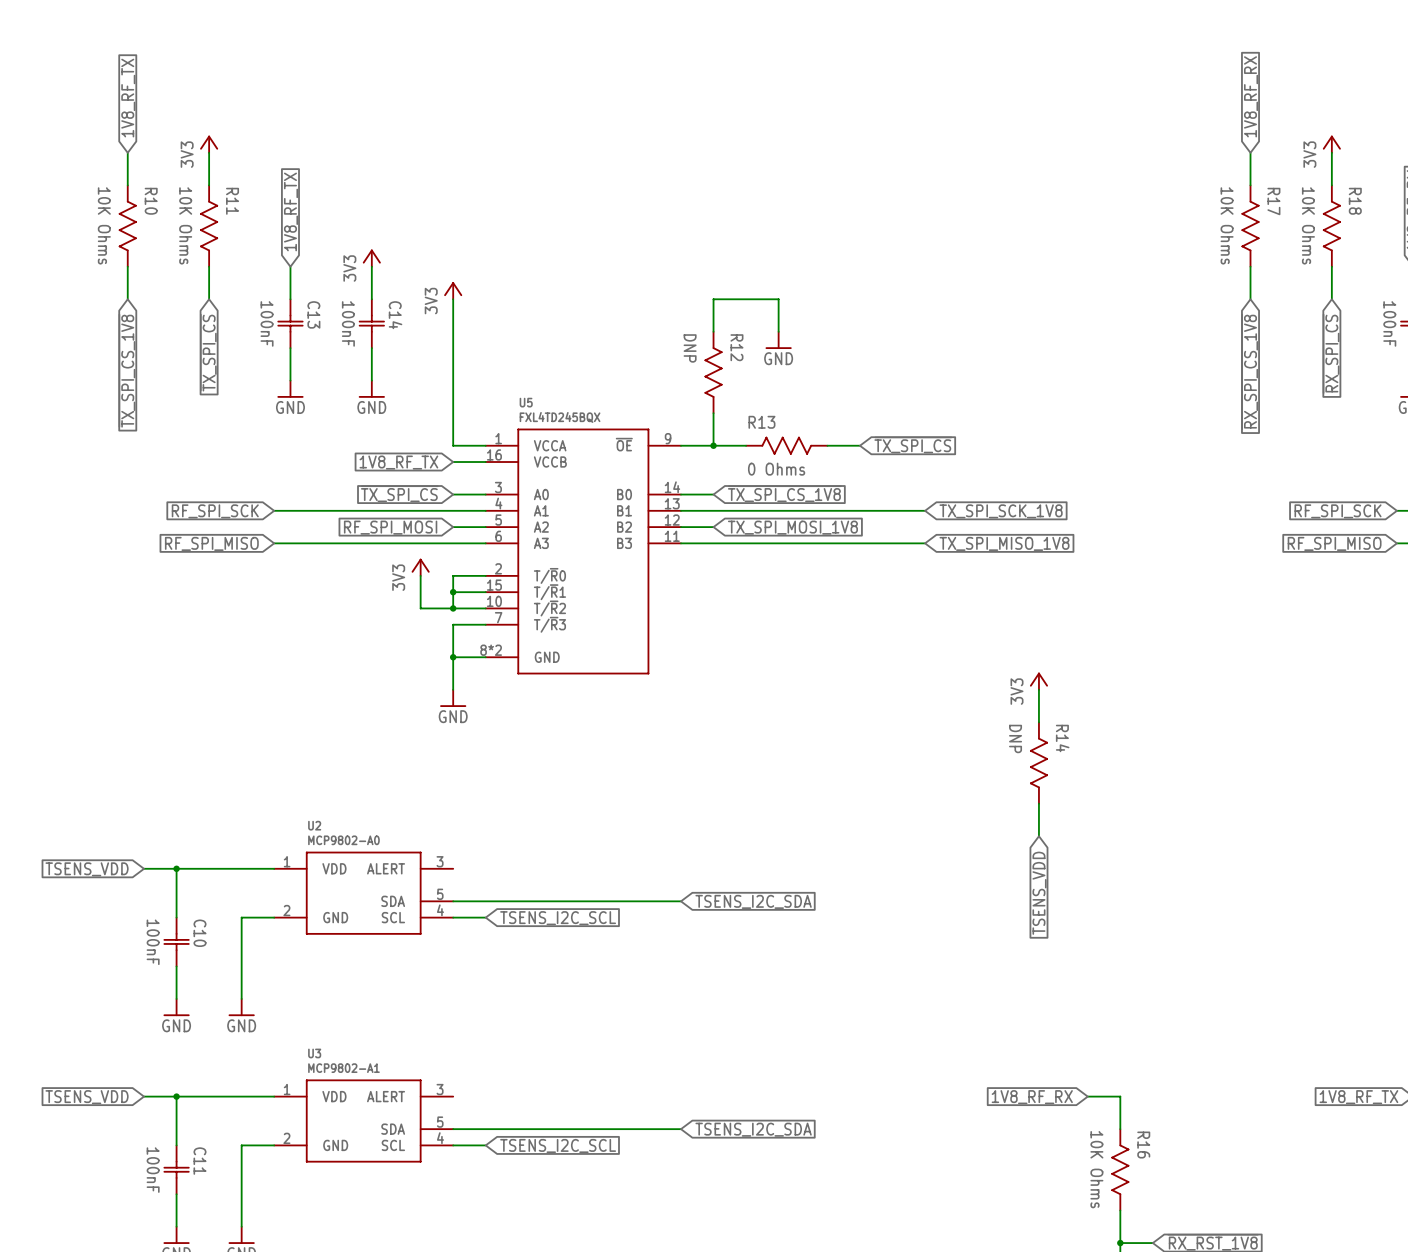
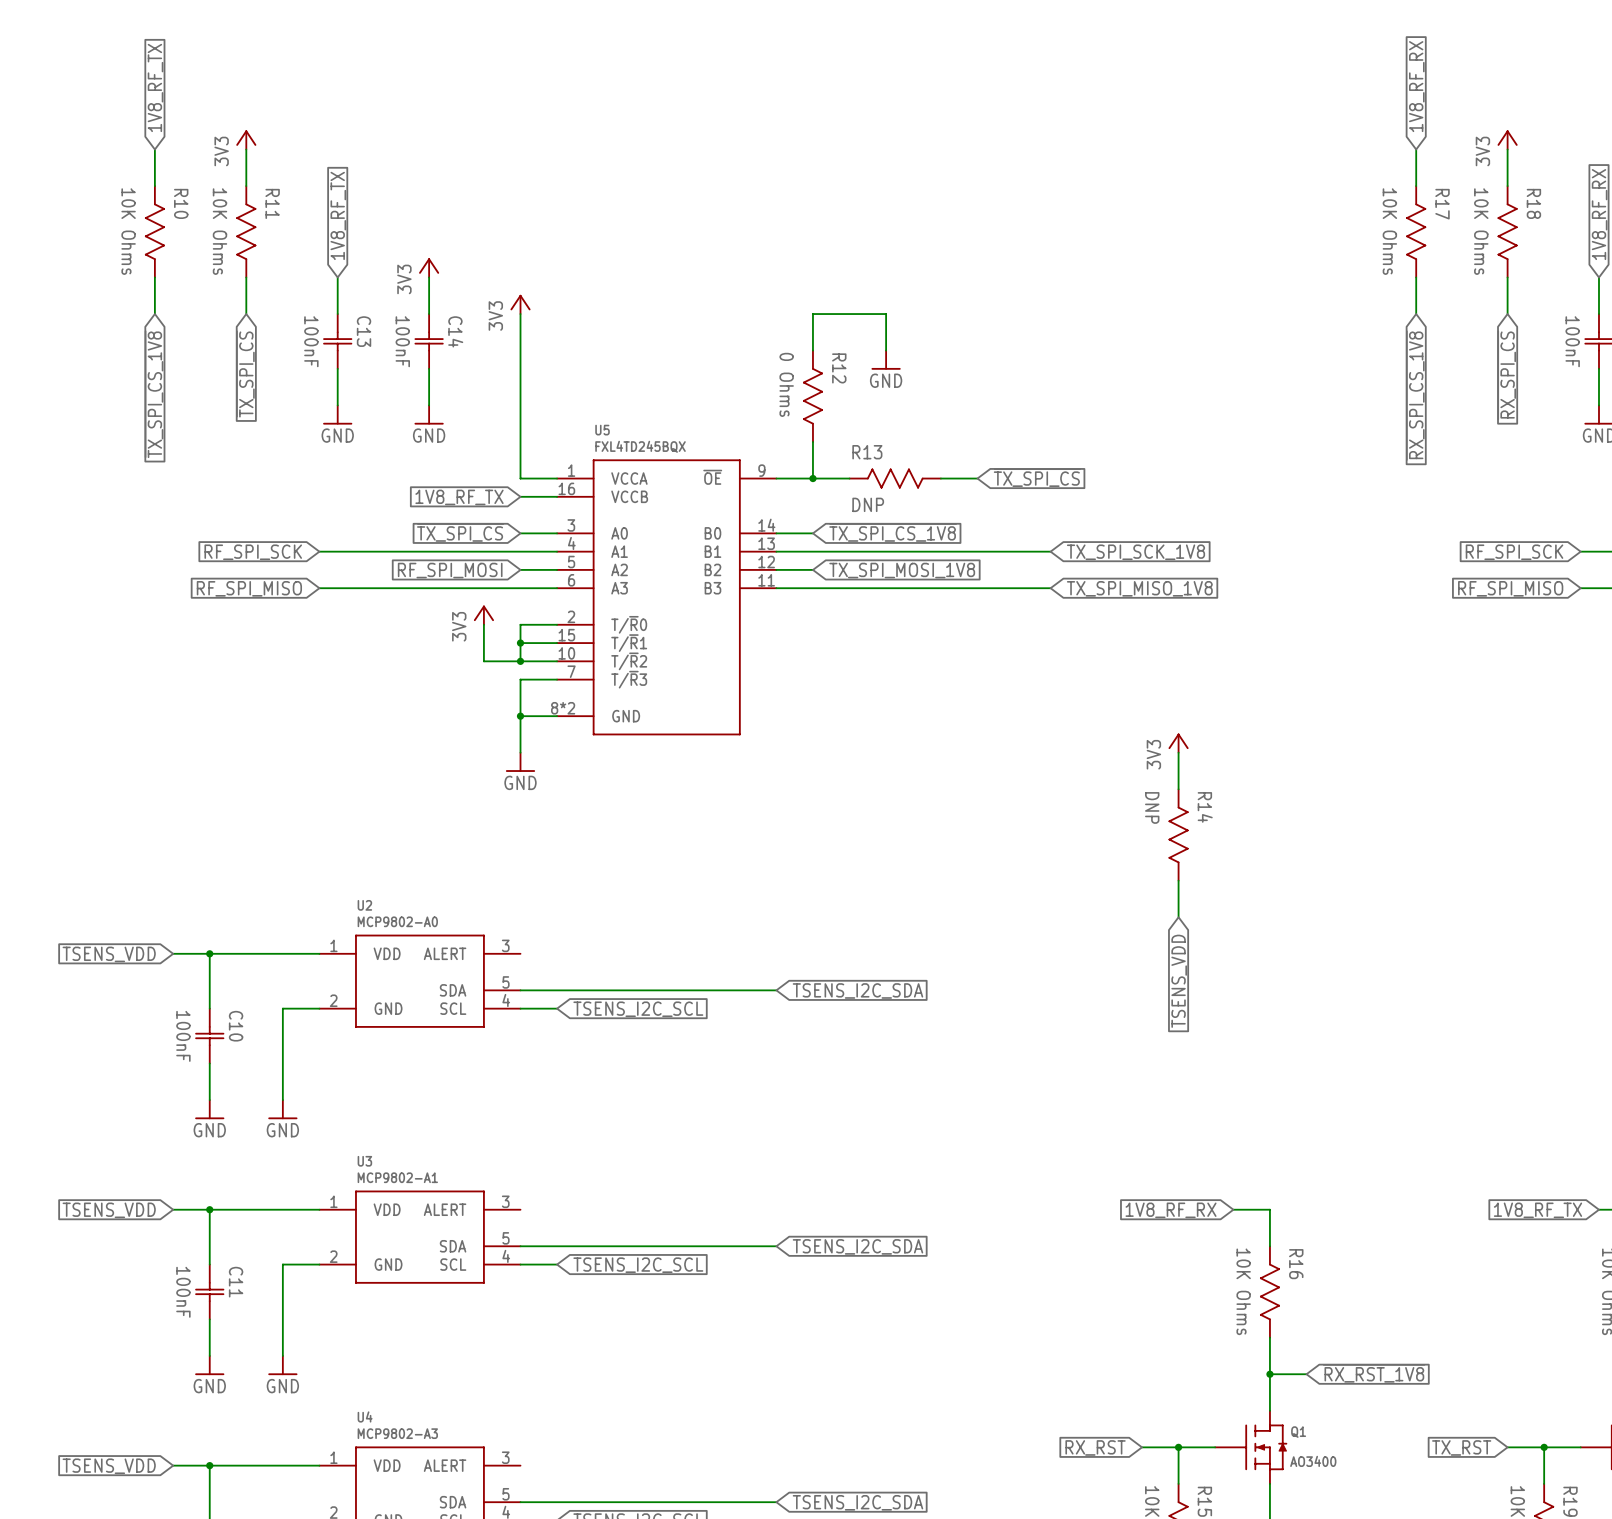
R12 value: DNP (690, 348) -> 0 Ohms (786, 384)
R13 value: 0 Ohms (776, 469) -> DNP (868, 504)

